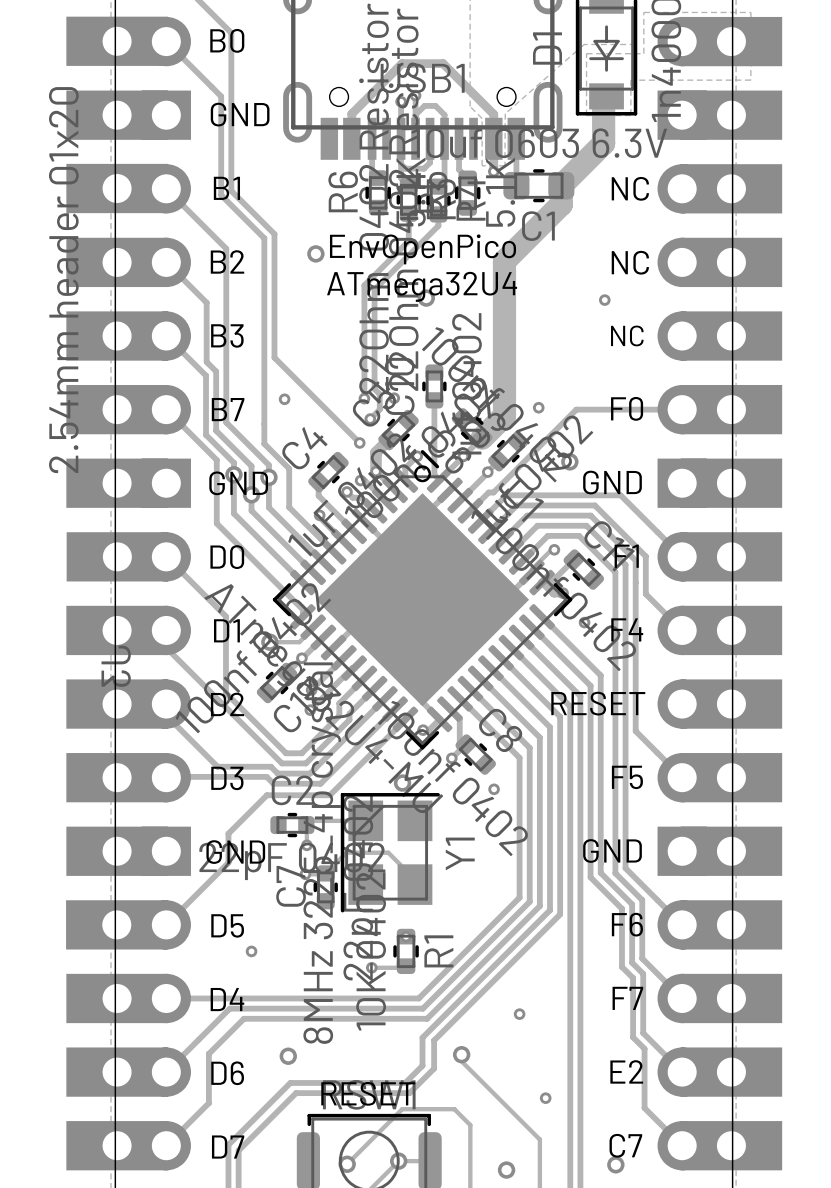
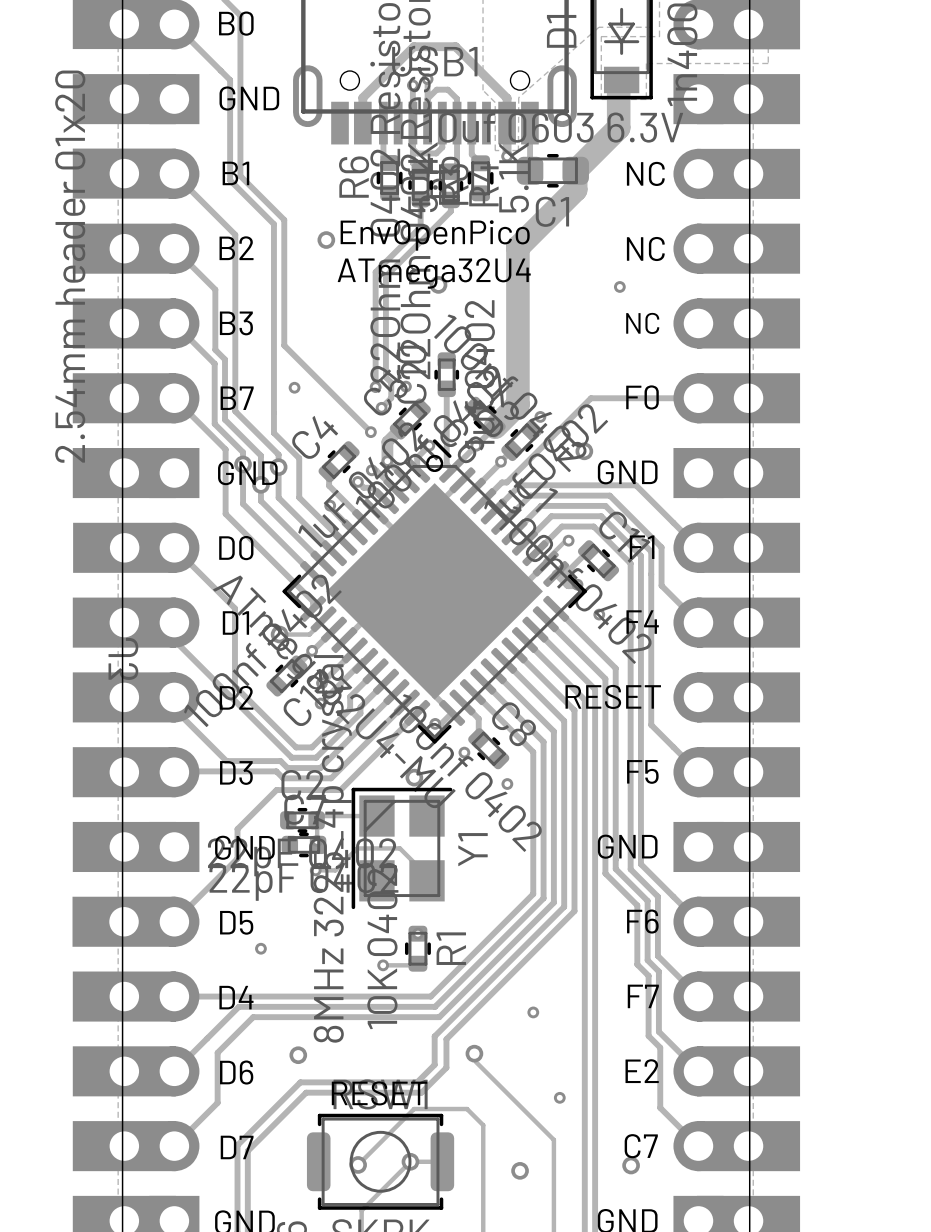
via position: (538, 407) -> (540, 416)
track: (459, 718) (459, 750) (451, 758) -> (472, 712) (478, 718) (478, 738)
C7 rotation: 0° (325, 887) -> 90° clockwise (303, 844)
C7 position: (325, 887) -> (303, 844)

